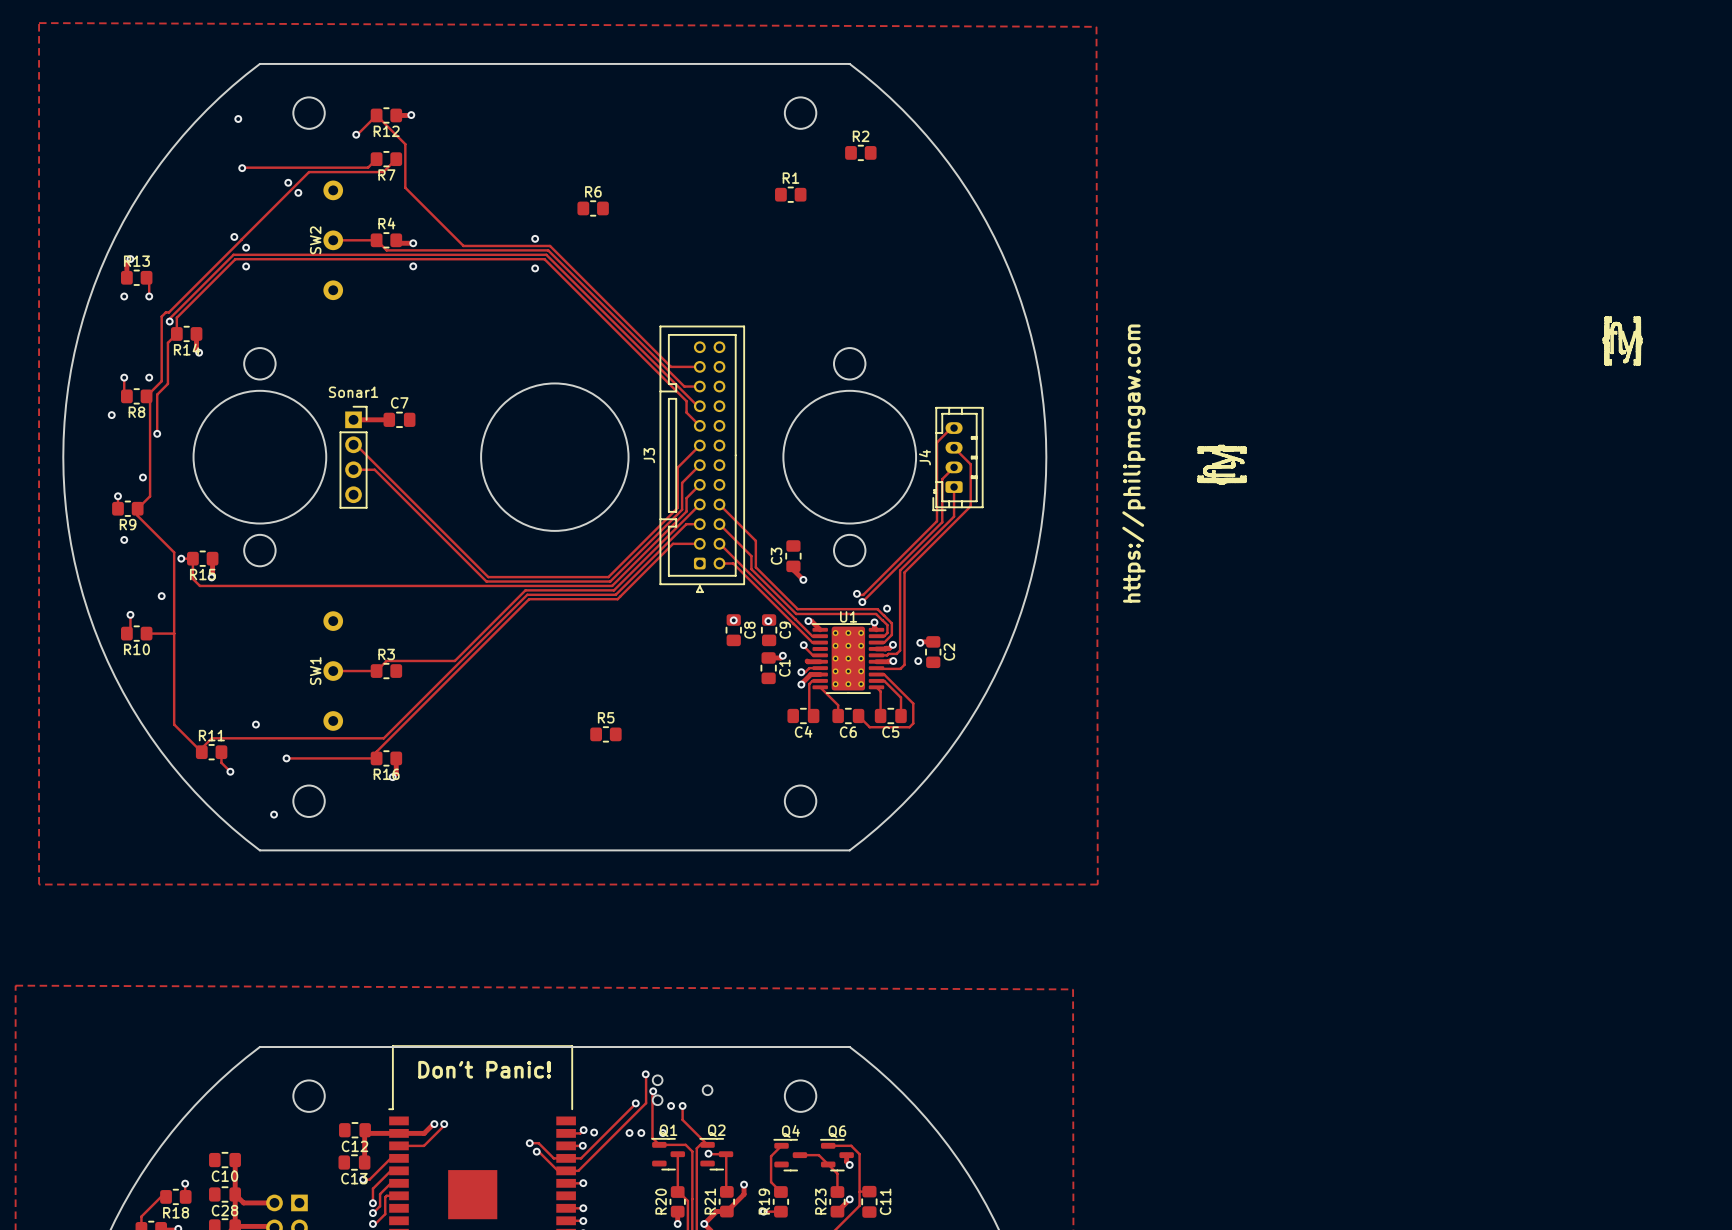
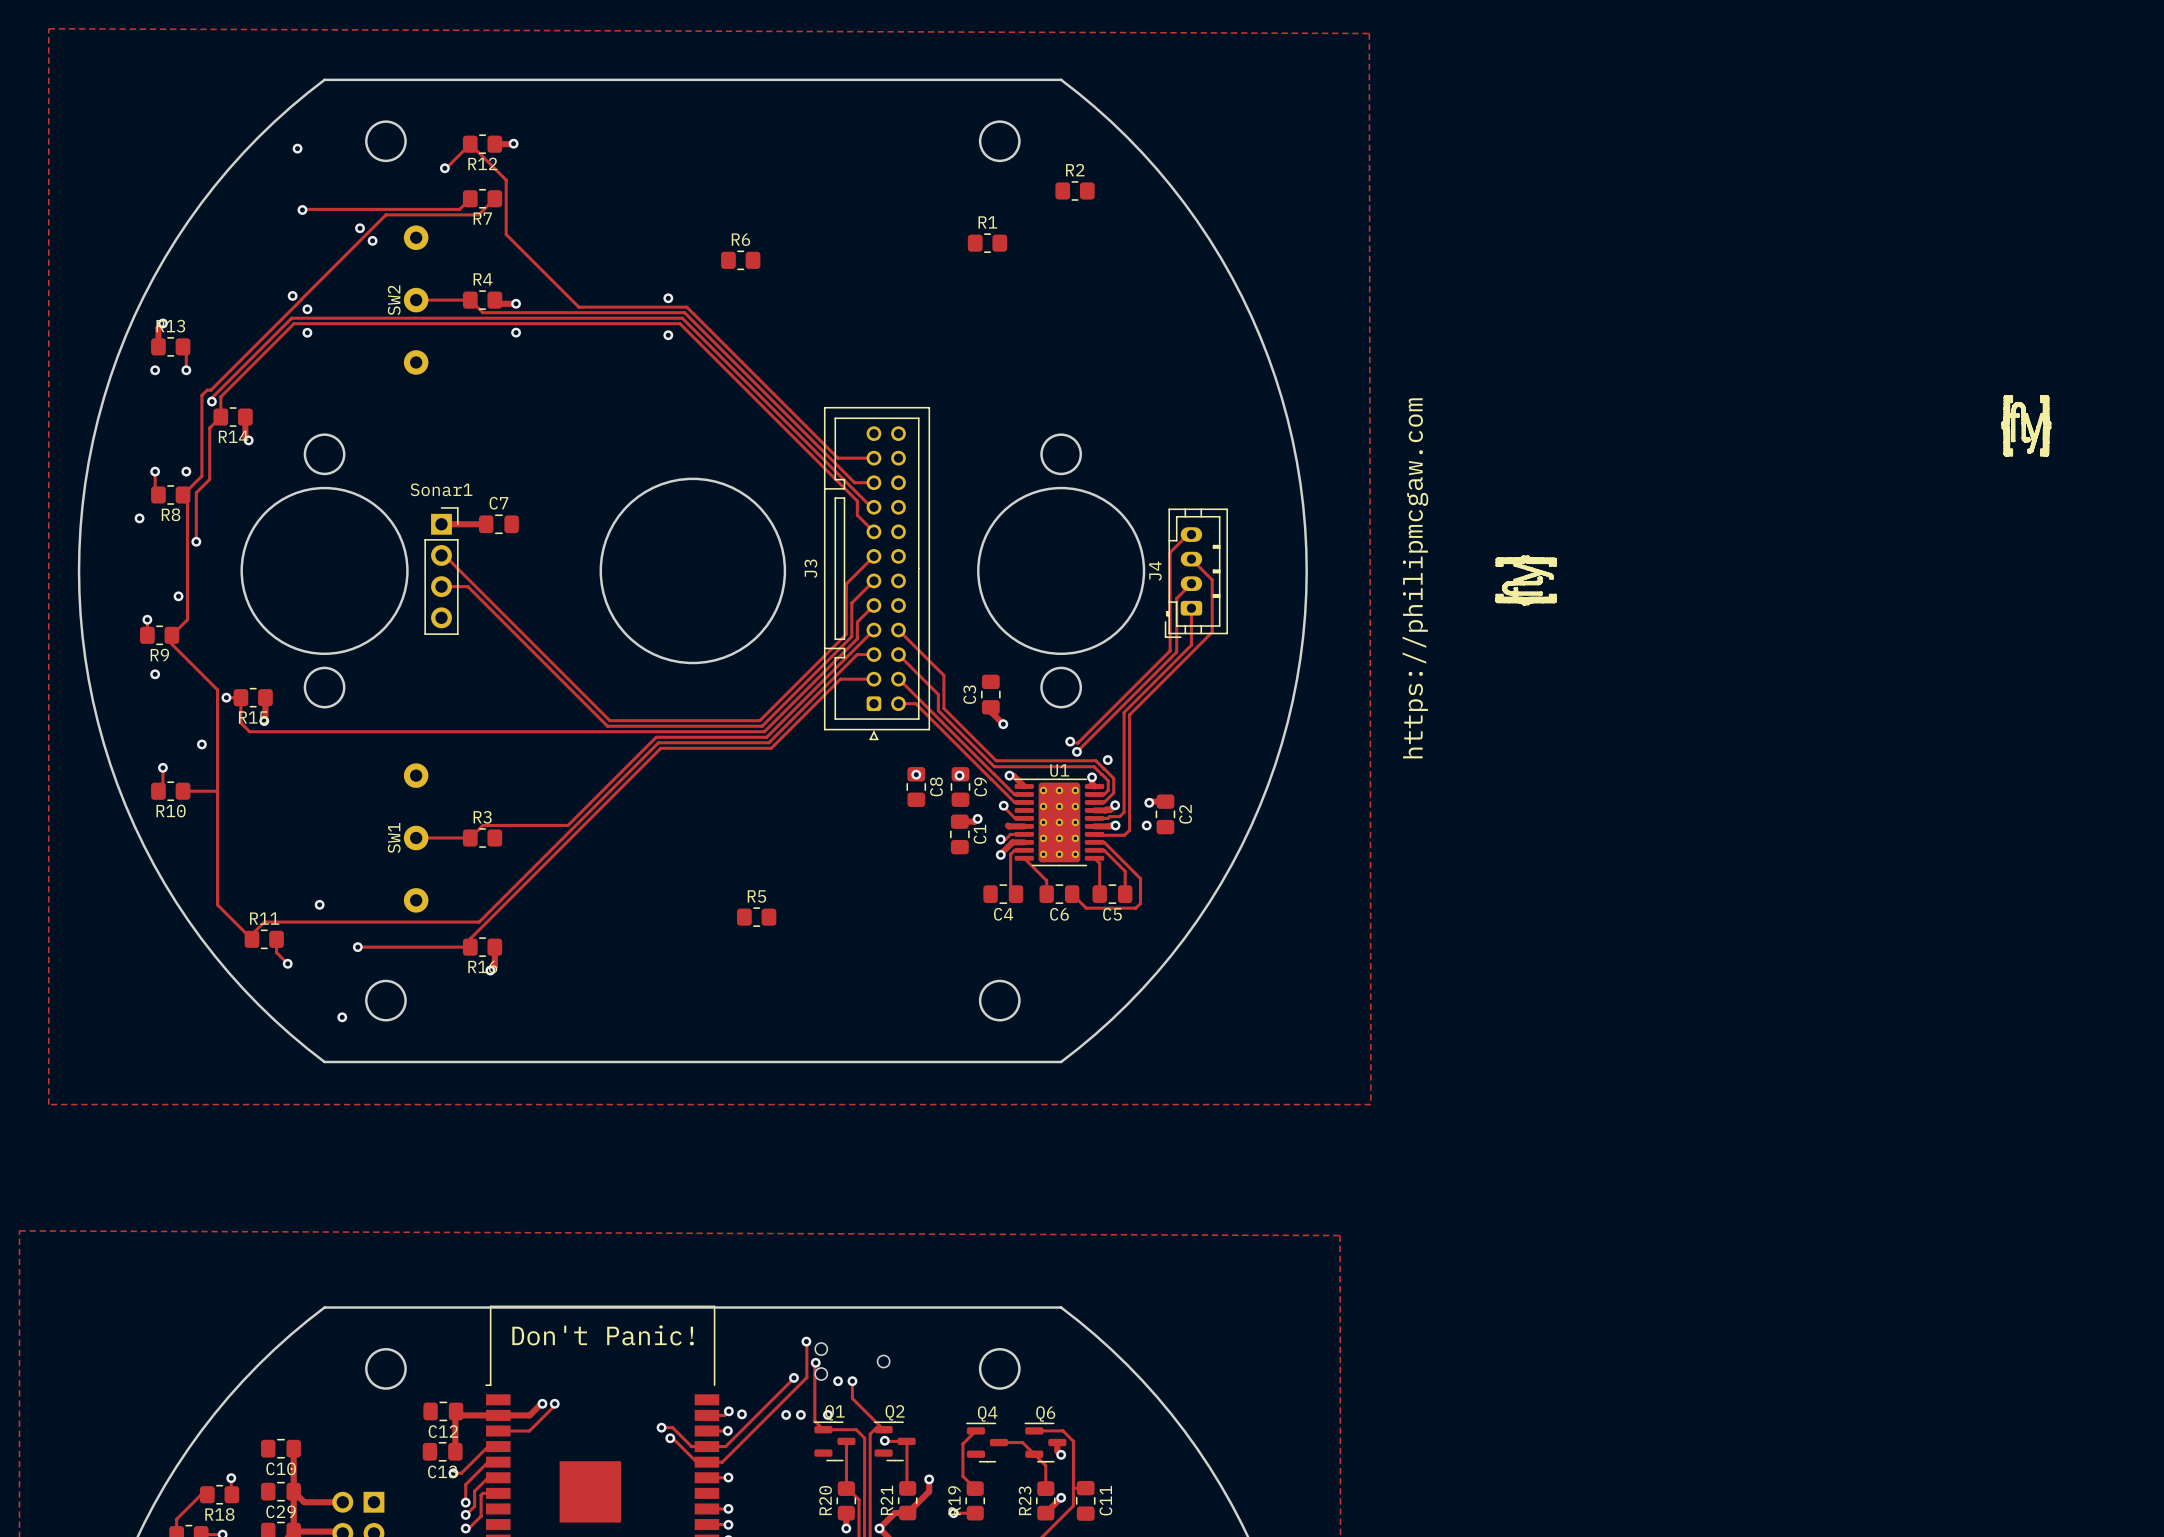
C28 name: C28 (225, 1210) -> C29 (281, 1511)

